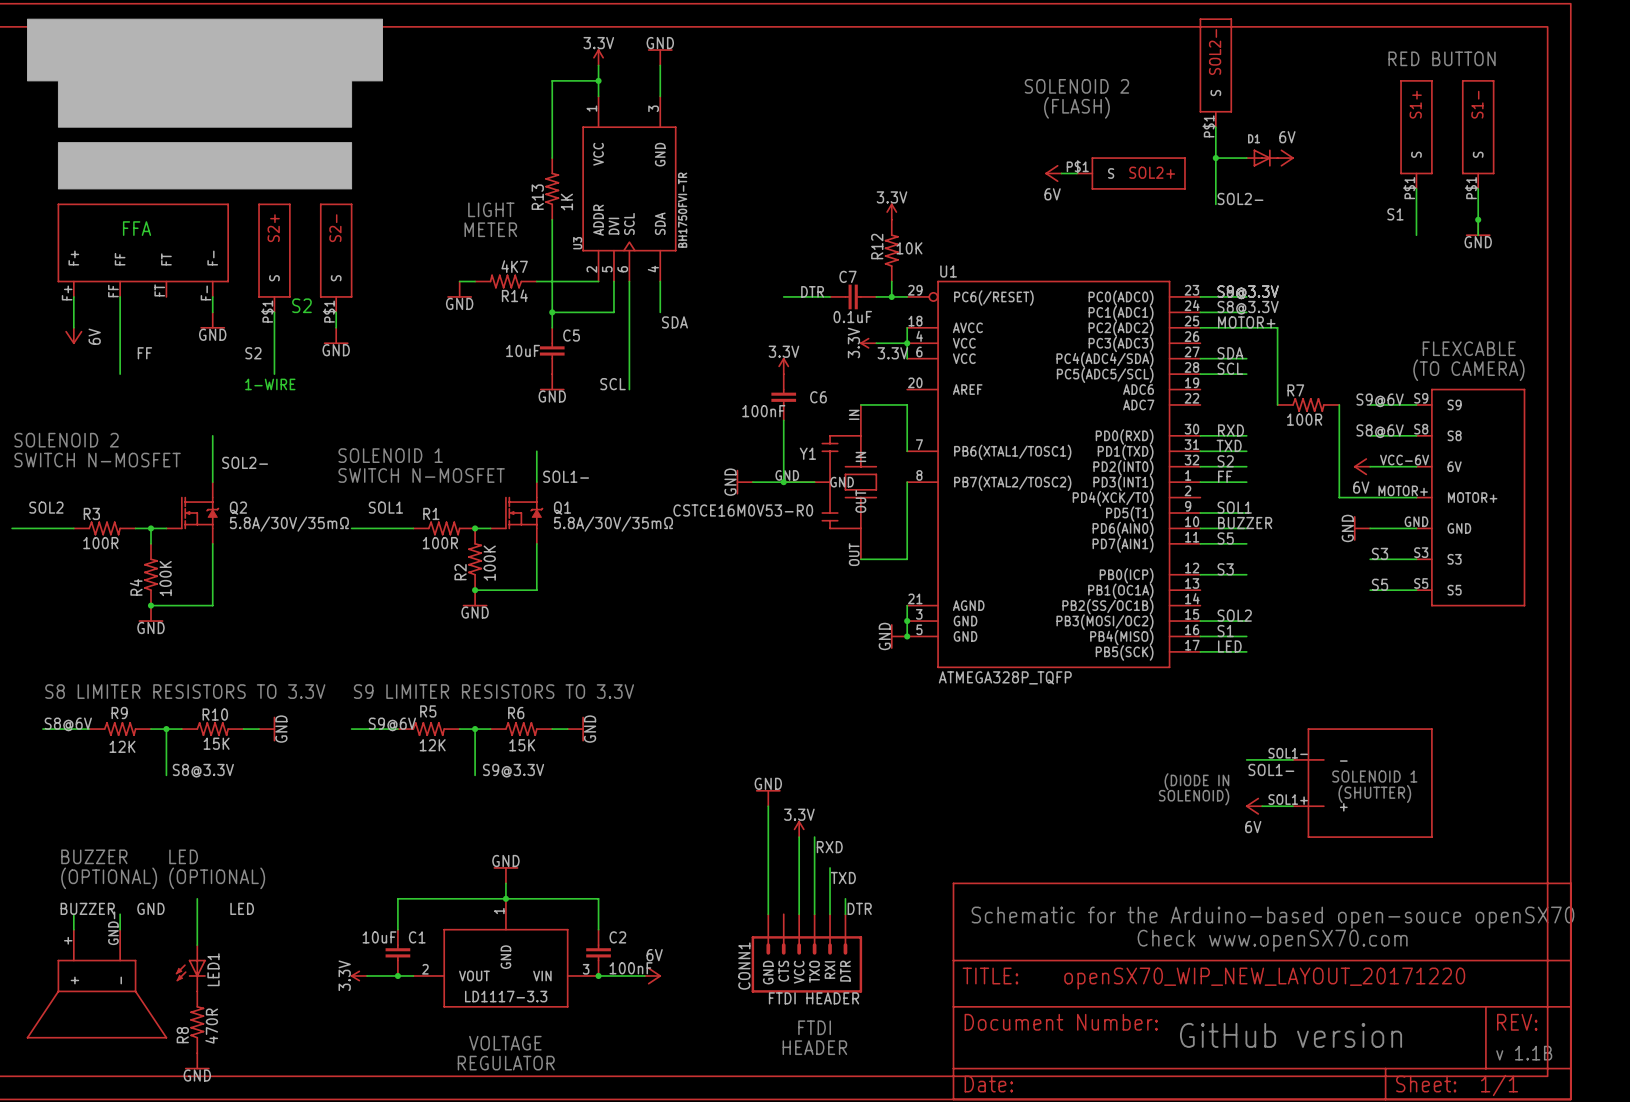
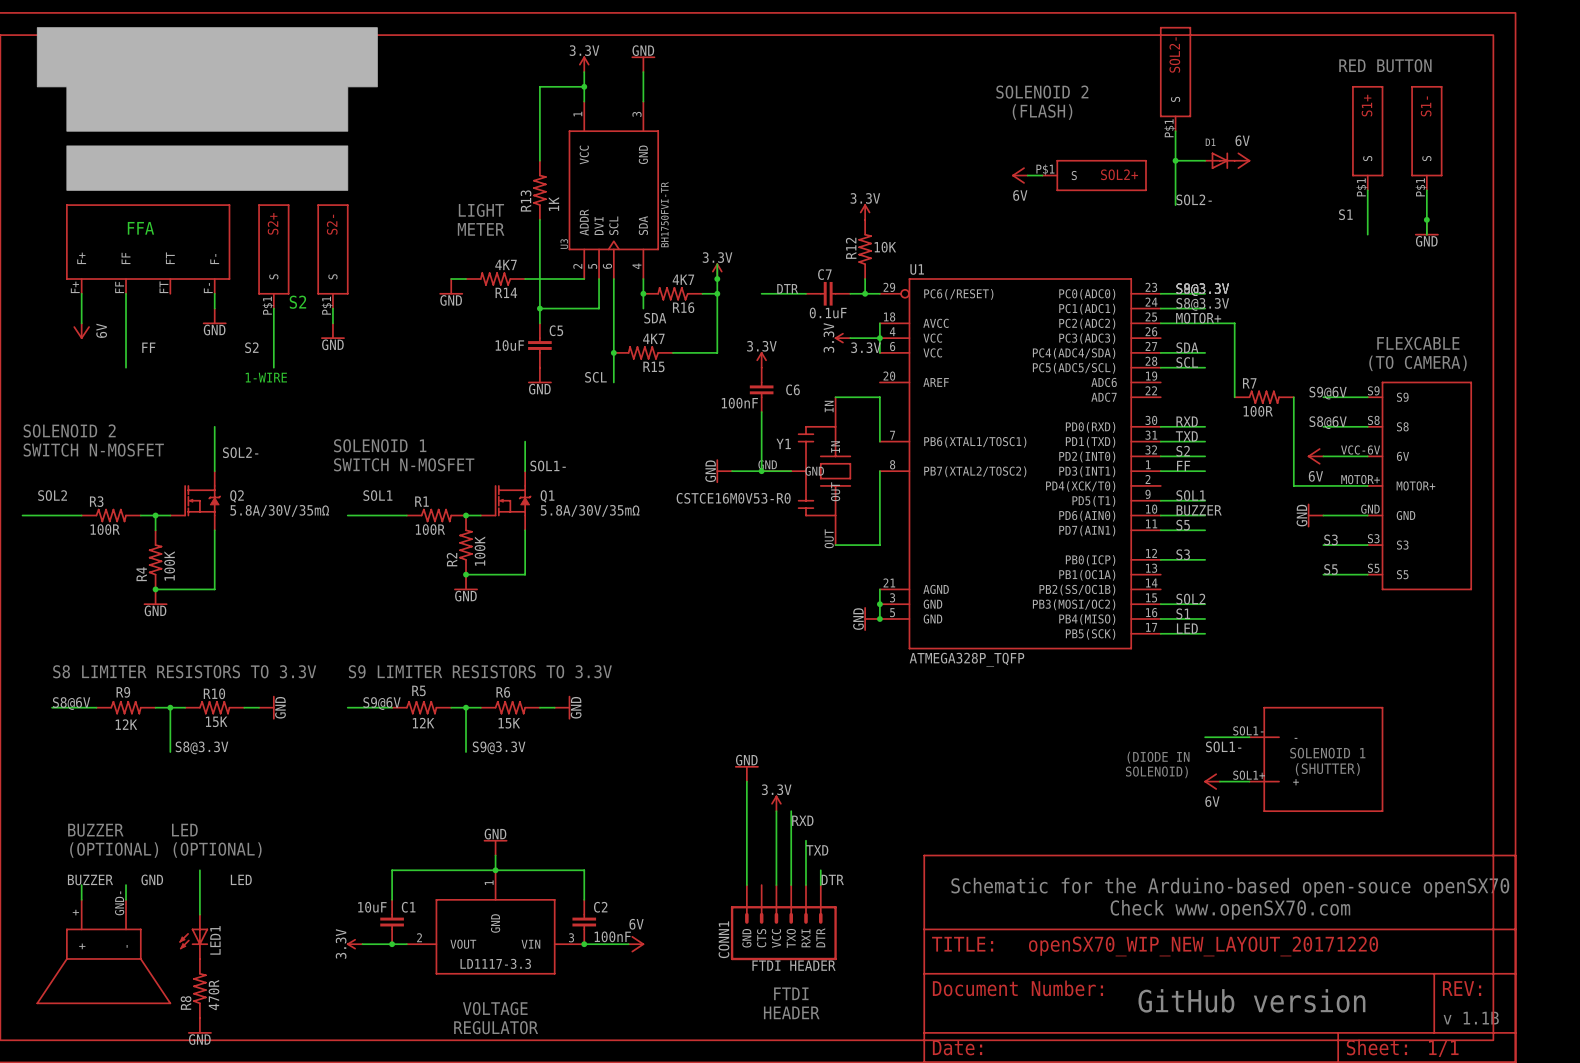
wire: none -> (717, 264) (717, 352) (672, 352)
power symbol: none -> 3.3V (717, 271)
junction: none -> (717, 279)
junction: none -> (643, 293)
R16: none -> 4K7 (672, 293)
wire: none -> (702, 293) (717, 293)
junction: none -> (717, 293)
junction: none -> (613, 352)
R15: none -> 4K7 (643, 352)

